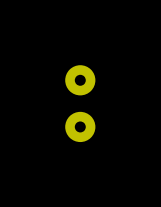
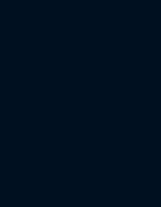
part: (80, 103) -> none

